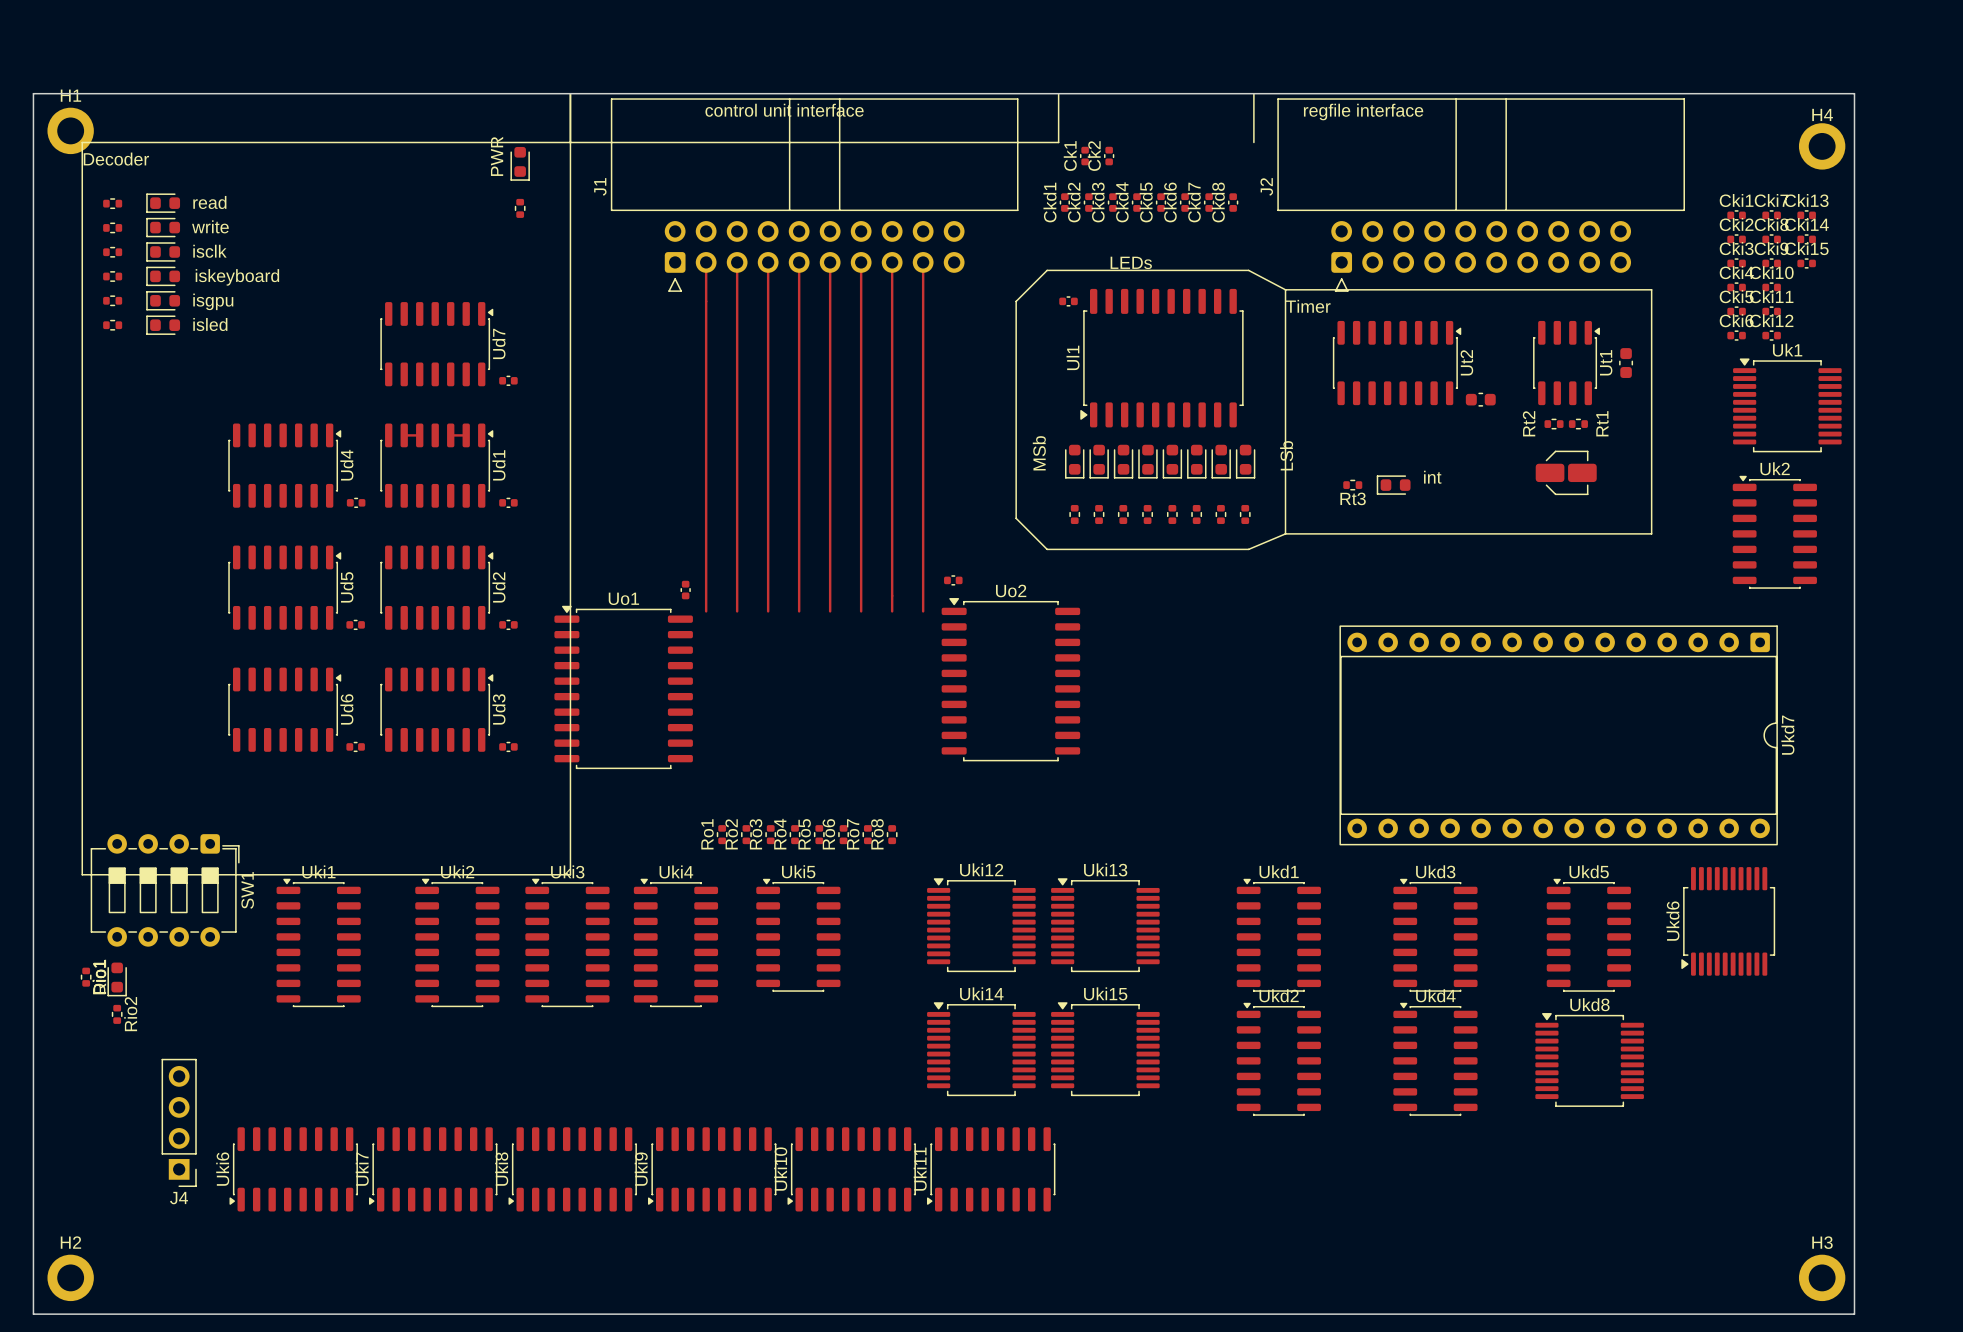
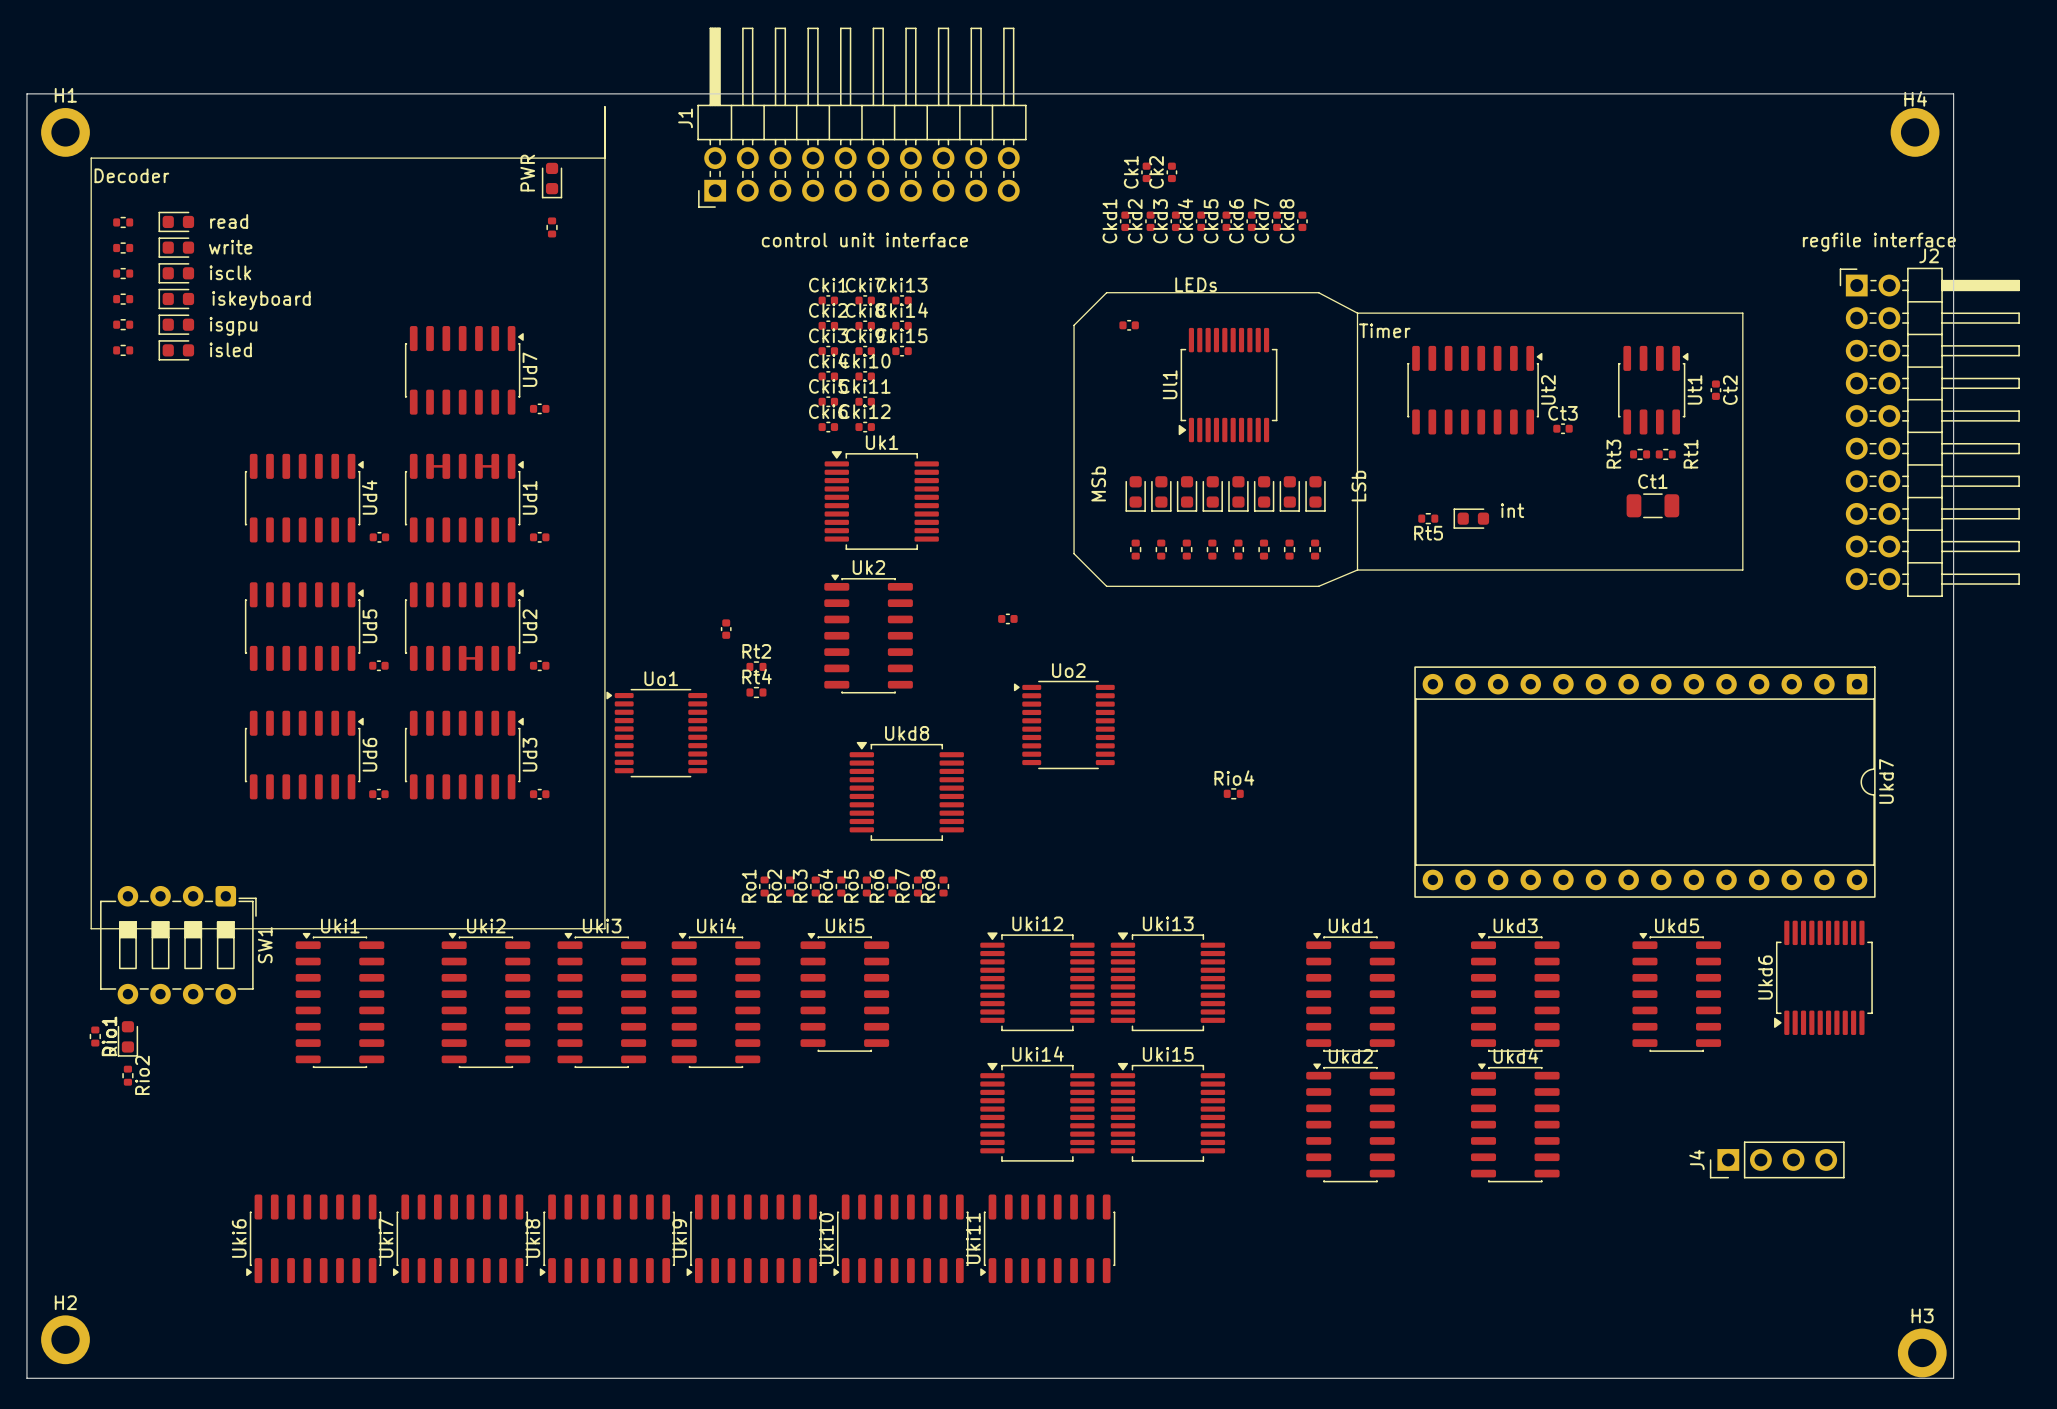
board edge: (33, 93) (1854, 93) (1854, 1314) (33, 1314) (33, 93) -> (26, 93) (26, 1378) (1953, 1378) (1953, 93) (26, 93)
line: (1058, 93) (1058, 142) (570, 142) -> none
line: (1253, 93) (1253, 142) -> none
J1 footprint: [610, 98, 1019, 292] -> [697, 27, 1027, 208]
J2 footprint: [1277, 98, 1685, 292] -> [1839, 267, 2020, 597]
text position: control unit interface (784, 110) -> control unit interface (864, 240)
text: regfile interface (1363, 112) -> none
H1 position: (70, 130) -> (65, 132)
H4 position: (1822, 146) -> (1915, 132)
J1 name position: J1 (600, 186) -> J1 (685, 118)
J2 name position: J2 (1266, 186) -> J2 (1929, 255)
Cki1 position: (1736, 215) -> (828, 300)
Cki7 position: (1771, 215) -> (865, 300)
Cki13 position: (1806, 215) -> (902, 300)
text: none -> regfile interface (1879, 242)
Cki2 position: (1736, 239) -> (828, 325)
Cki8 position: (1771, 239) -> (865, 325)
Cki14 position: (1806, 239) -> (902, 325)
top track: (706, 262) (706, 611) -> none
top track: (737, 262) (737, 611) -> none
top track: (768, 262) (768, 611) -> none
top track: (799, 262) (799, 611) -> none
top track: (830, 262) (830, 611) -> none
top track: (861, 262) (861, 611) -> none
top track: (892, 262) (892, 611) -> none
top track: (923, 262) (923, 611) -> none
Cki3 position: (1736, 263) -> (828, 351)
Cki9 position: (1771, 263) -> (865, 351)
Cki15 position: (1806, 263) -> (902, 351)
Cki4 position: (1736, 287) -> (828, 376)
Cki10 position: (1771, 287) -> (865, 376)
Ul1 footprint: [1080, 288, 1244, 428] -> [1178, 327, 1278, 443]
Cki5 position: (1736, 311) -> (828, 401)
Cki11 position: (1771, 311) -> (865, 401)
Cki6 position: (1736, 335) -> (828, 427)
Cki12 position: (1771, 335) -> (865, 427)
Ul1 name position: Ul1 (1073, 357) -> Ul1 (1170, 384)
part: (1626, 363) -> none
Ct2: none -> (1715, 390)
part: (1480, 399) -> none
Ct3: none -> (1563, 428)
Uk1 position: (1787, 405) -> (881, 500)
Rt2 name: Rt2 (1529, 423) -> Rt3 (1613, 454)
part: (1566, 472) -> none
Ct1: none -> (1652, 505)
Rt3 name: Rt3 (1353, 498) -> Rt5 (1428, 533)
Uk2 position: (1774, 532) -> (868, 634)
Uo2 name position: Uo2 (1011, 590) -> Uo2 (1068, 670)
Uo1 name position: Uo1 (623, 598) -> Uo1 (661, 678)
Uo2 footprint: [941, 598, 1081, 762] -> [1013, 680, 1115, 770]
Uo1 footprint: [554, 605, 693, 770] -> [606, 688, 708, 778]
top track: none -> (462, 658) (478, 658)
Rt2: none -> (756, 666)
Rt4: none -> (756, 692)
Rio4: none -> (1233, 793)
Ukd8 position: (1589, 1059) -> (906, 791)
J4 rotation: 0° (179, 1122) -> 90° clockwise (1777, 1159)
J4 position: (179, 1122) -> (1777, 1159)
H2 position: (70, 1277) -> (65, 1339)

